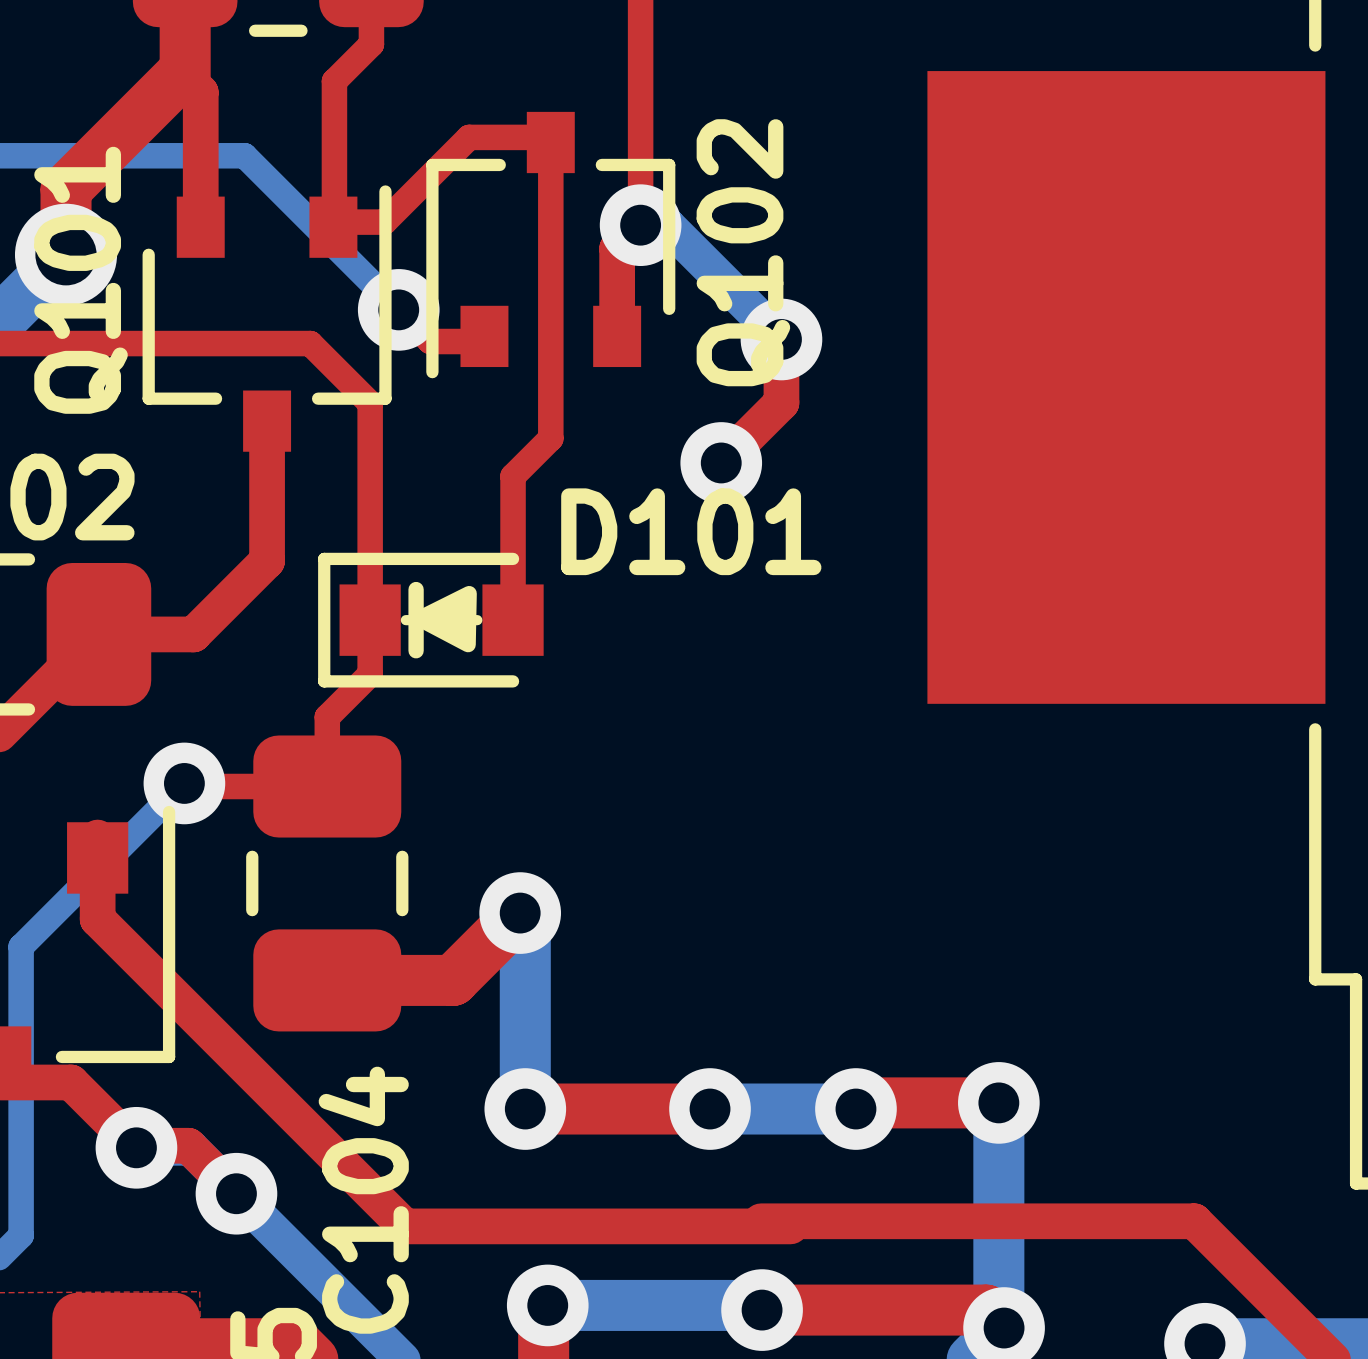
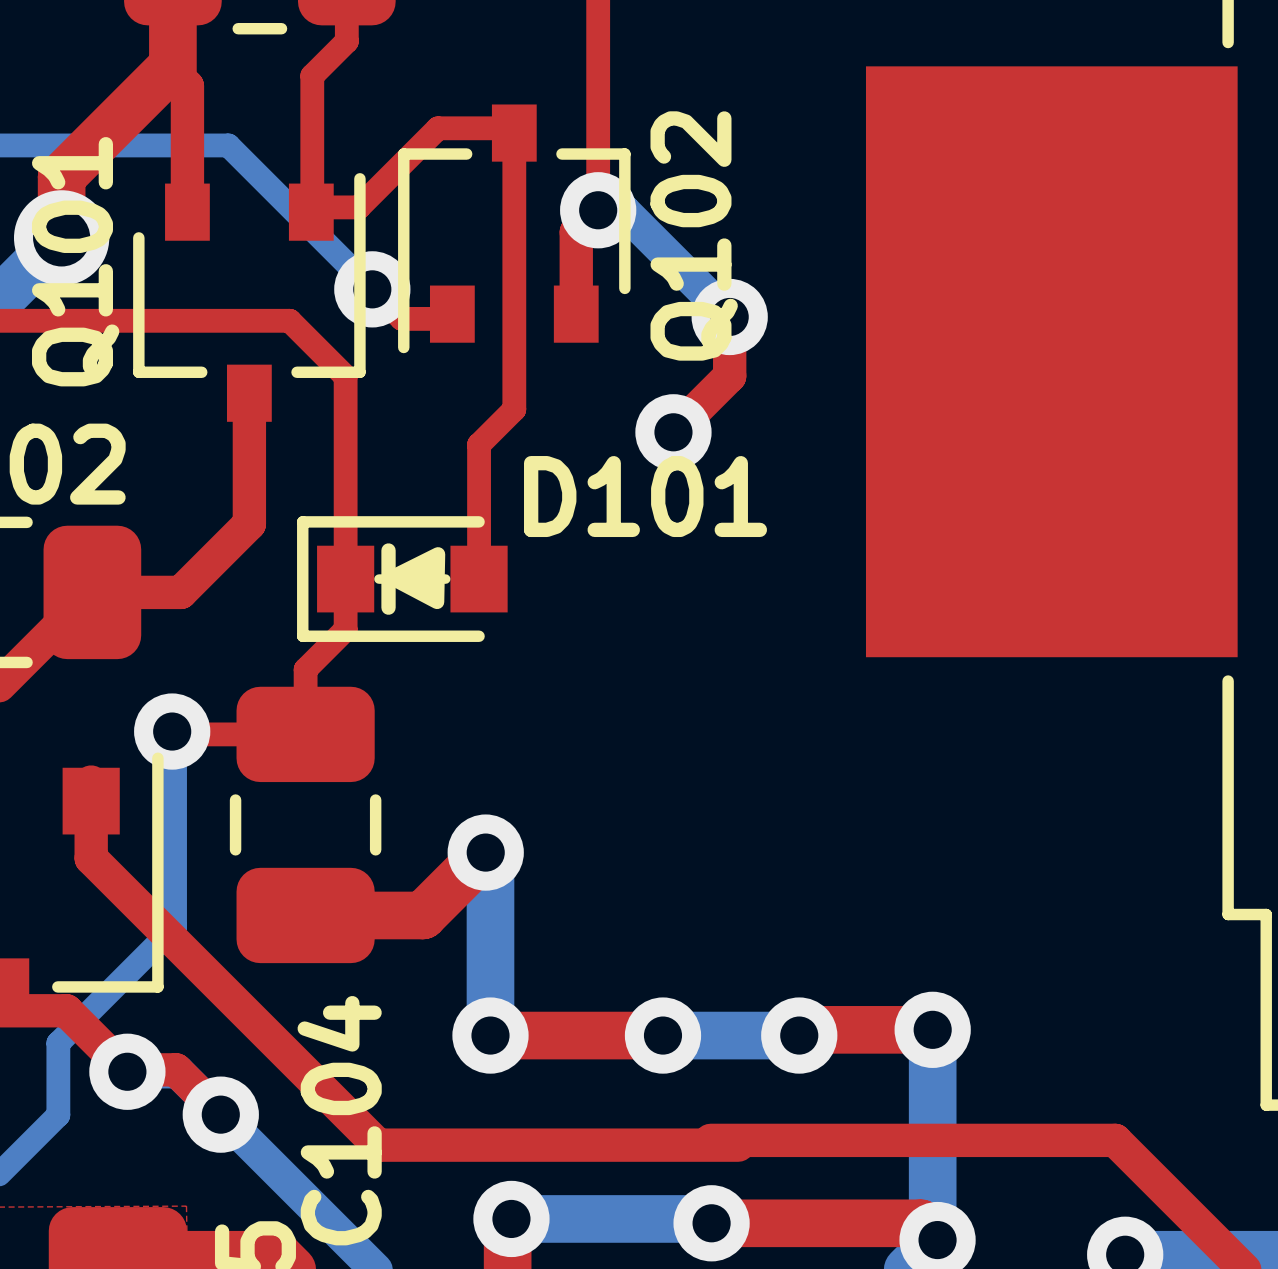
bottom track: (184, 783) (21, 946) (21, 1235) -> (172, 731) (175, 734) (175, 926) (58, 1043) (58, 1115) (19, 1153)

